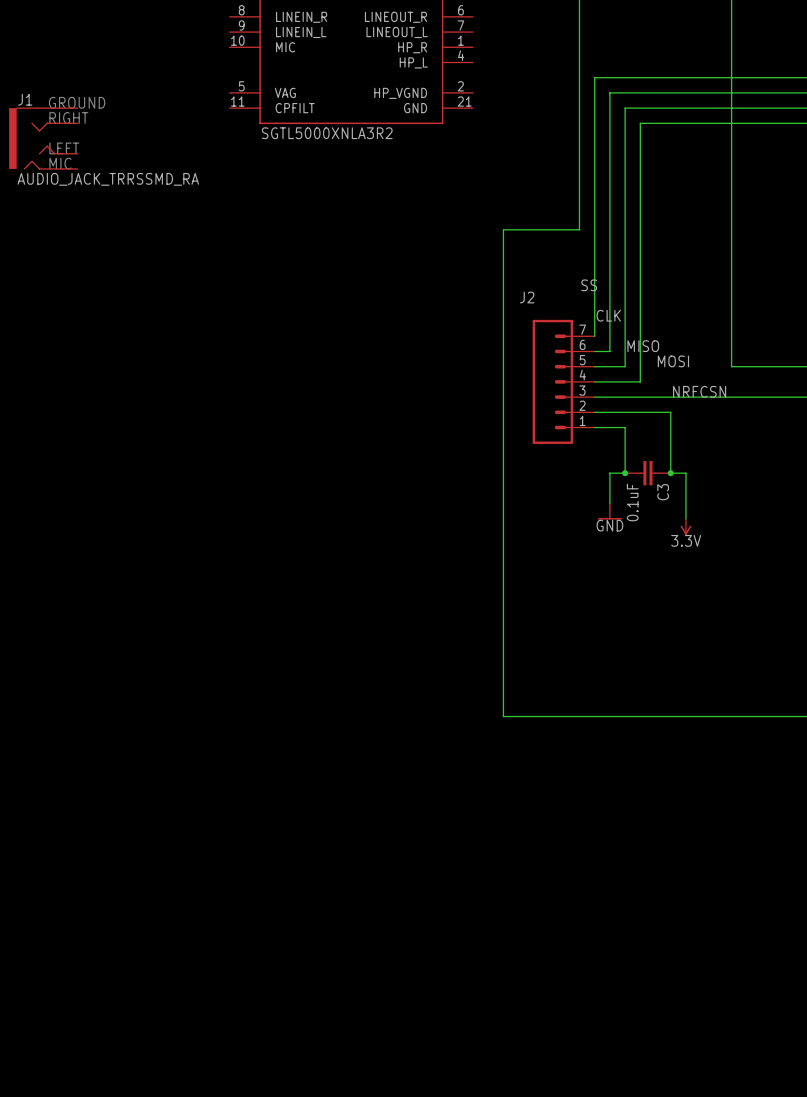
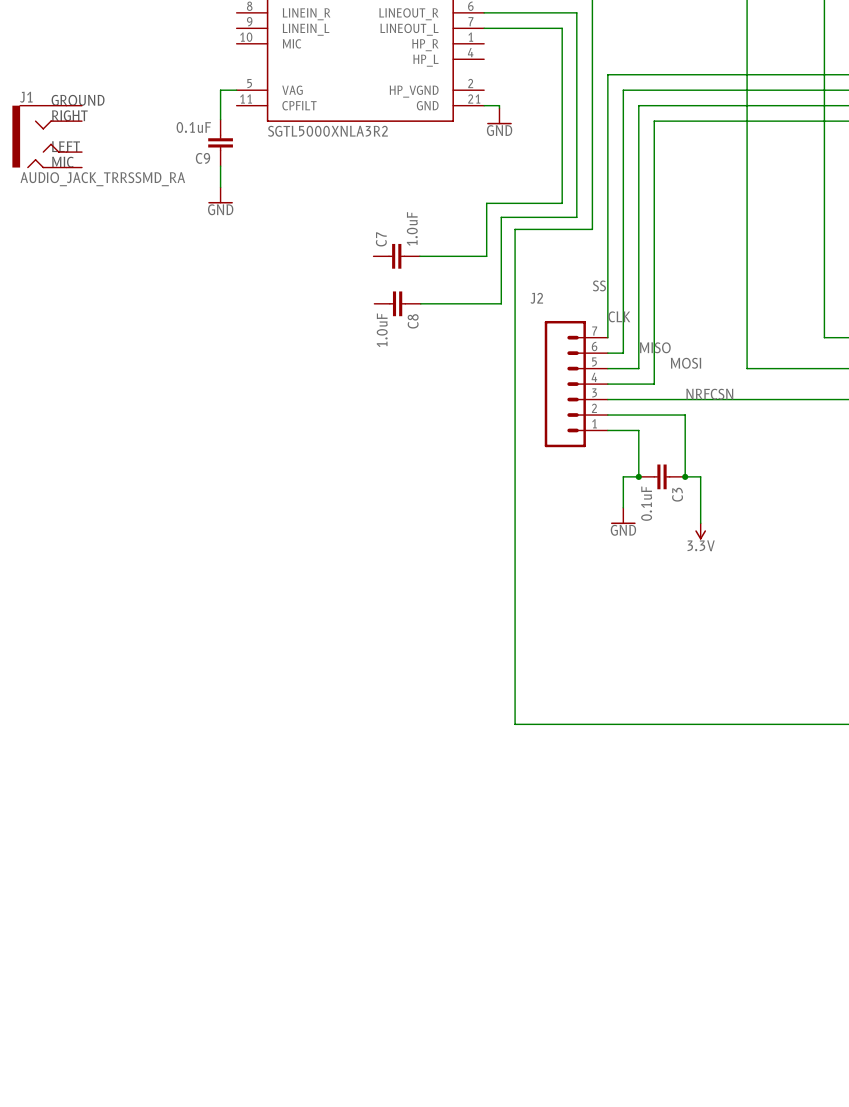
wire: none -> (484, 12) (576, 12) (576, 217) (501, 217) (501, 303) (420, 303)
wire: none -> (484, 28) (562, 28) (562, 203) (486, 203) (486, 256) (419, 256)
wire: none -> (236, 90) (220, 90) (220, 119)
wire: none -> (484, 105) (499, 105) (499, 108)
power symbol: none -> GND (499, 116)
C9: none -> 0.1uF (220, 142)
wire: none -> (220, 166) (220, 187)
power symbol: none -> GND (220, 195)
C7: none -> 1.0uF (396, 256)
C8: none -> 1.0uF (397, 303)

